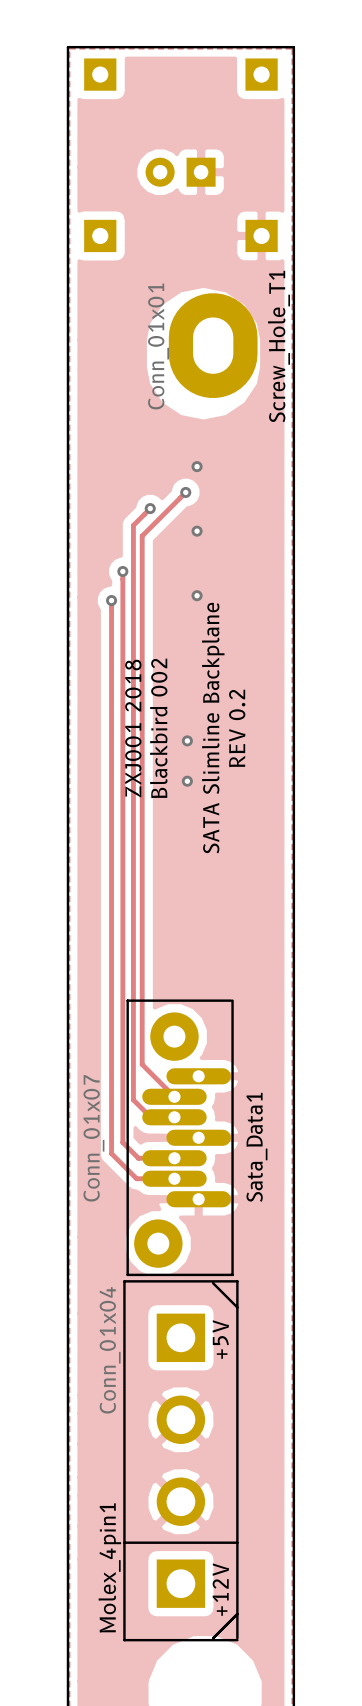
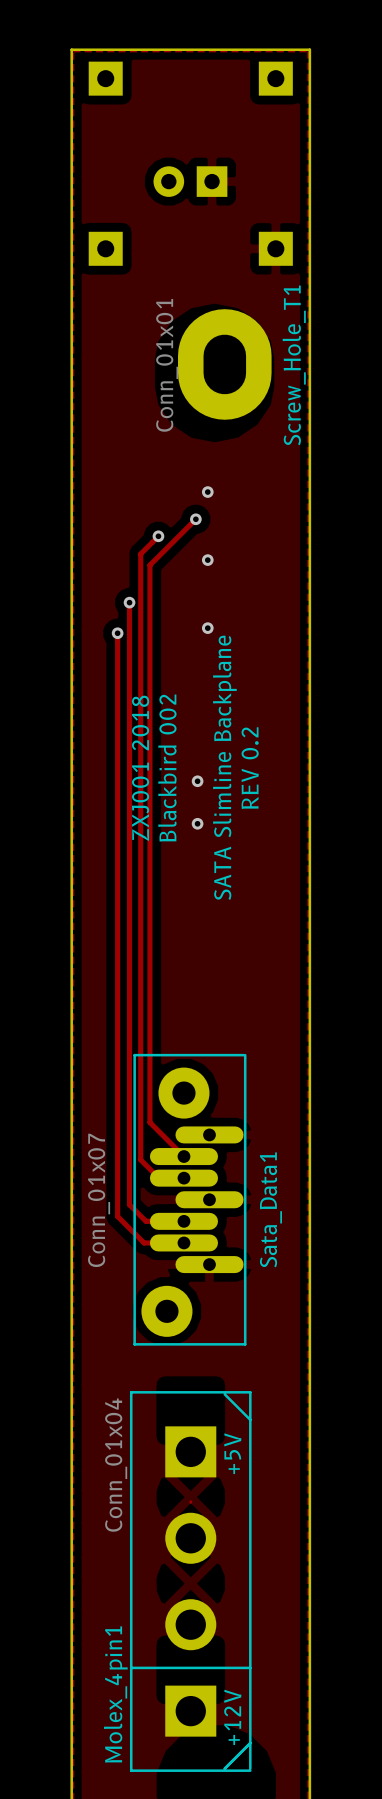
Molex_4pin1 position: (180, 1460) -> (190, 1581)

